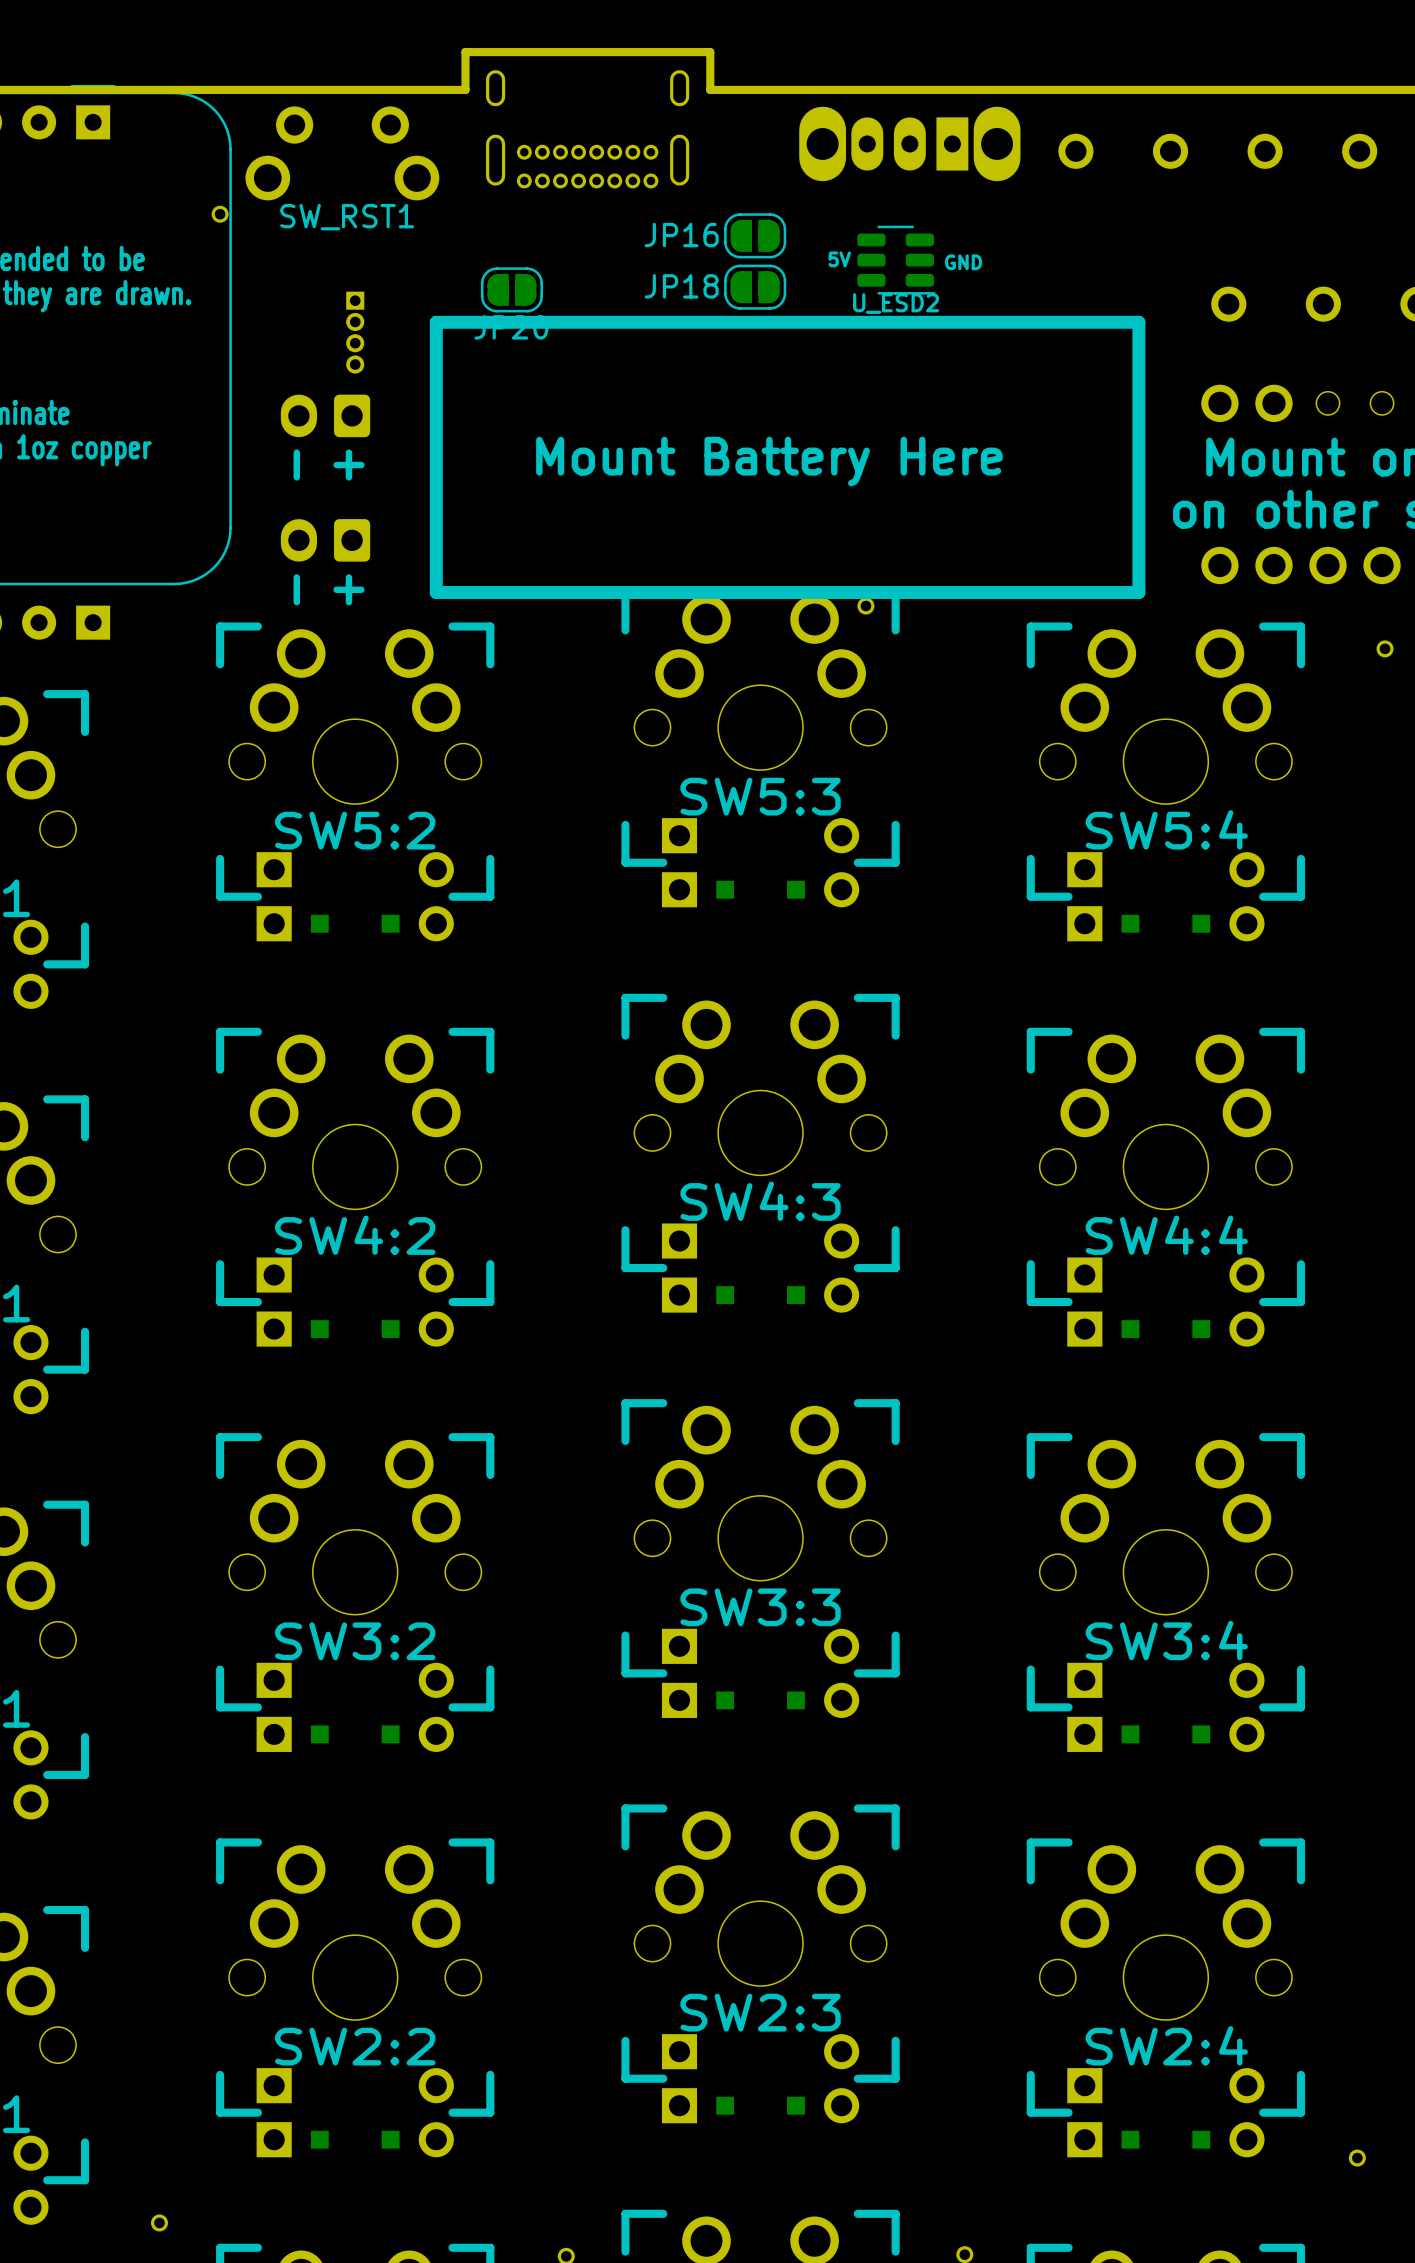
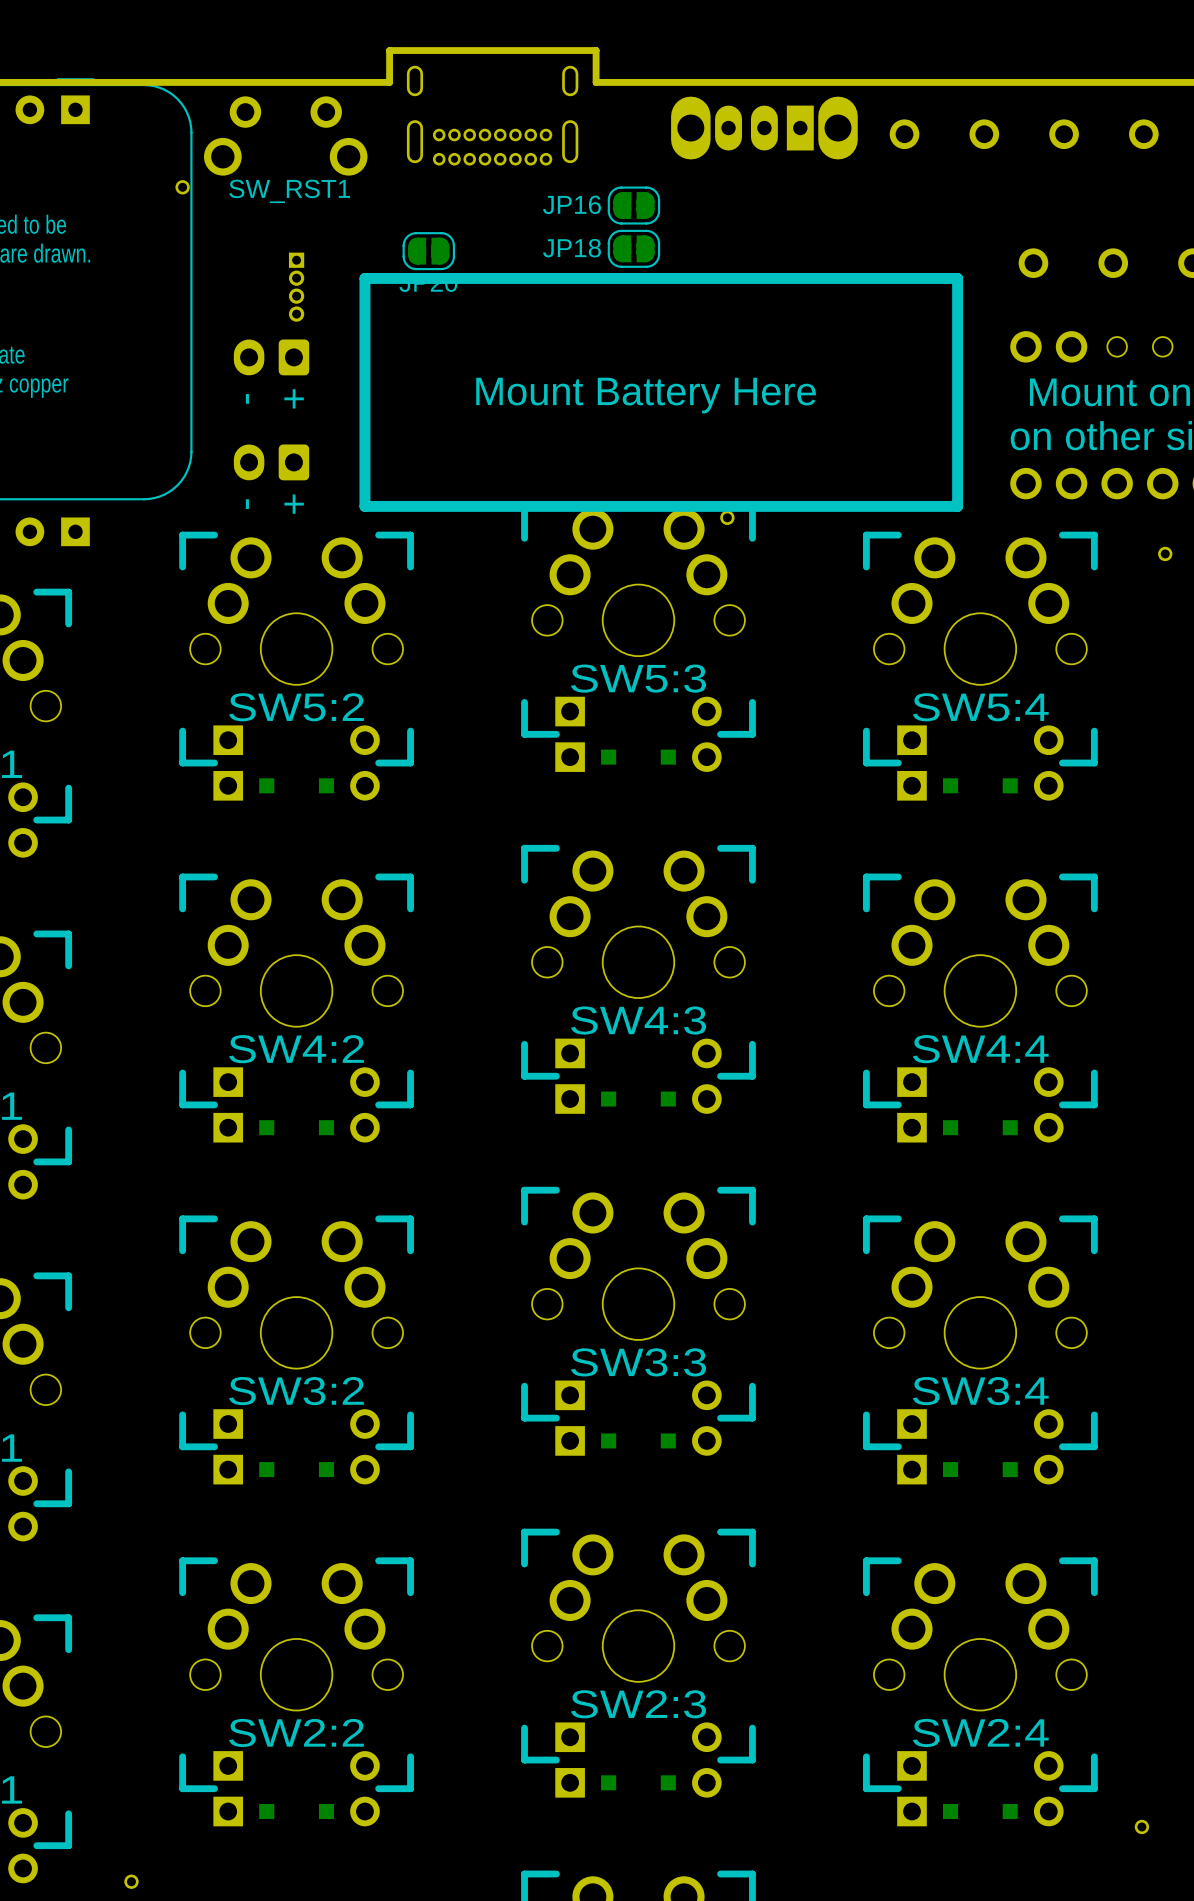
text: 5V (839, 259) -> none
U_ESD2: (896, 260) -> none
text: GND (963, 262) -> none

